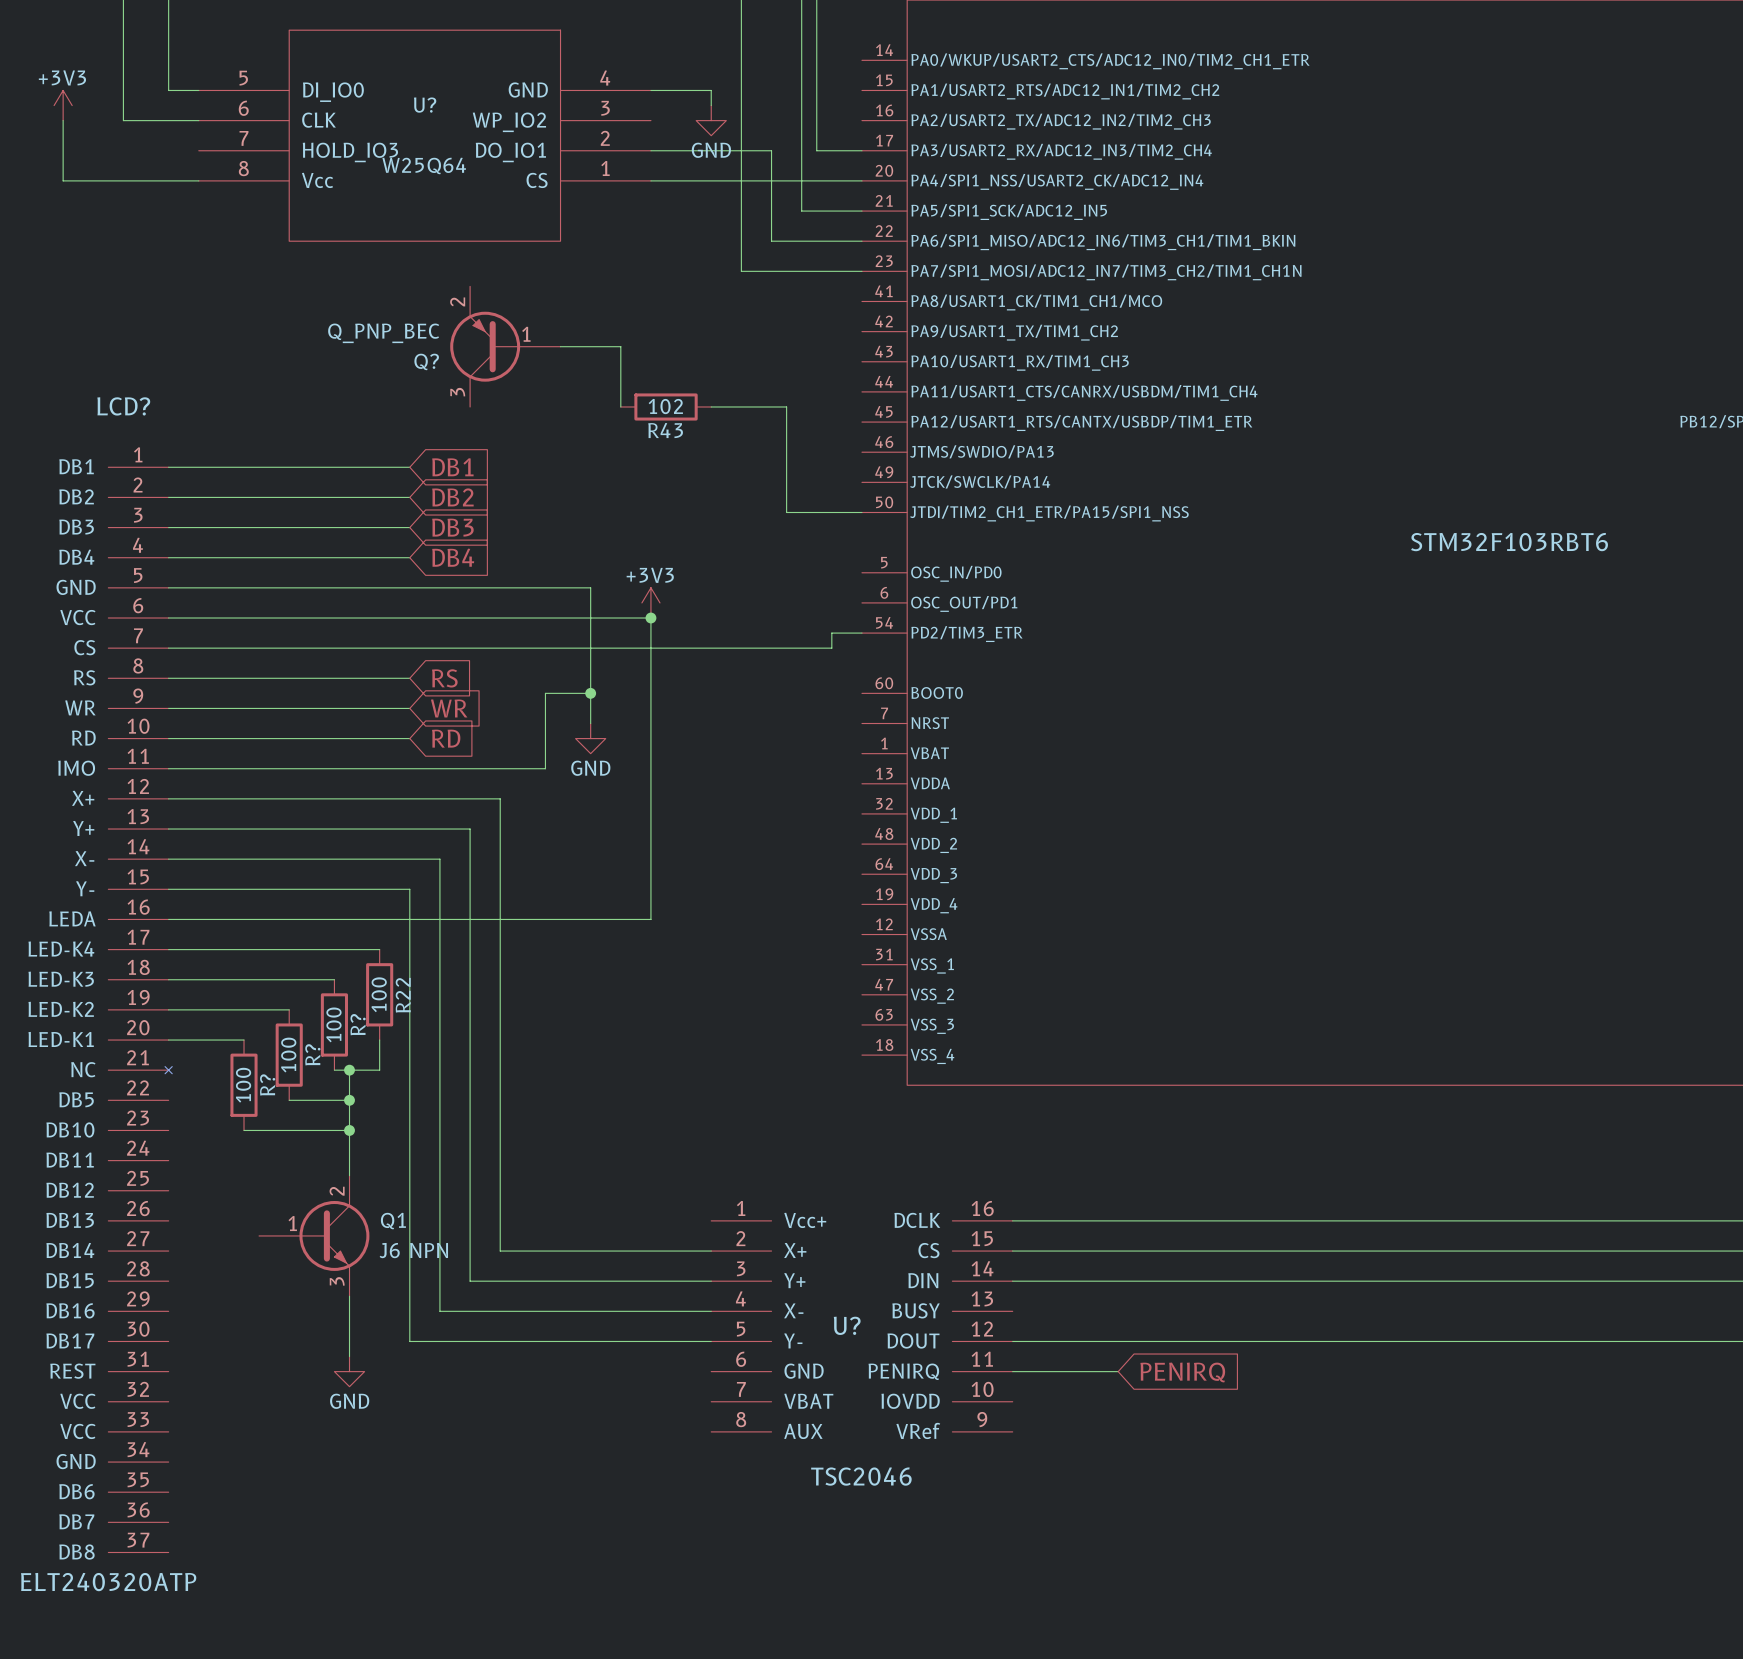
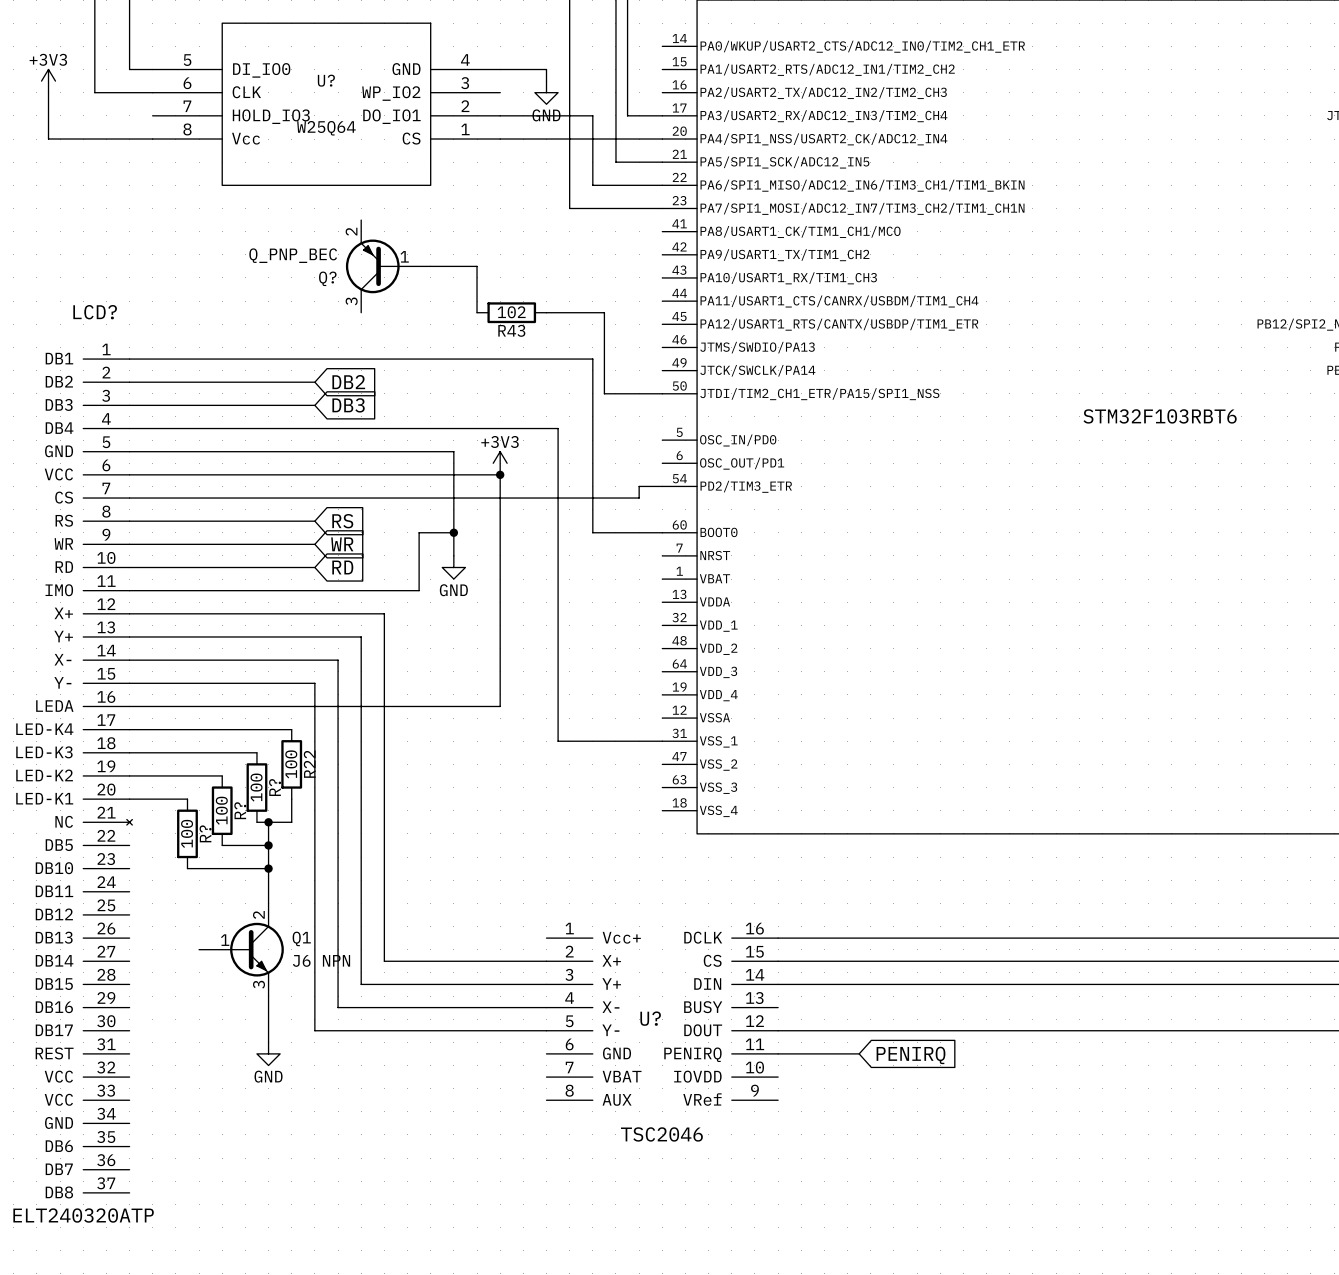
wire: none -> (314, 359) (592, 359) (592, 532) (662, 532)
global label: DB1 (452, 467) -> none
wire: none -> (314, 428) (558, 428) (558, 741) (662, 741)
global label: DB4 (453, 557) -> none

